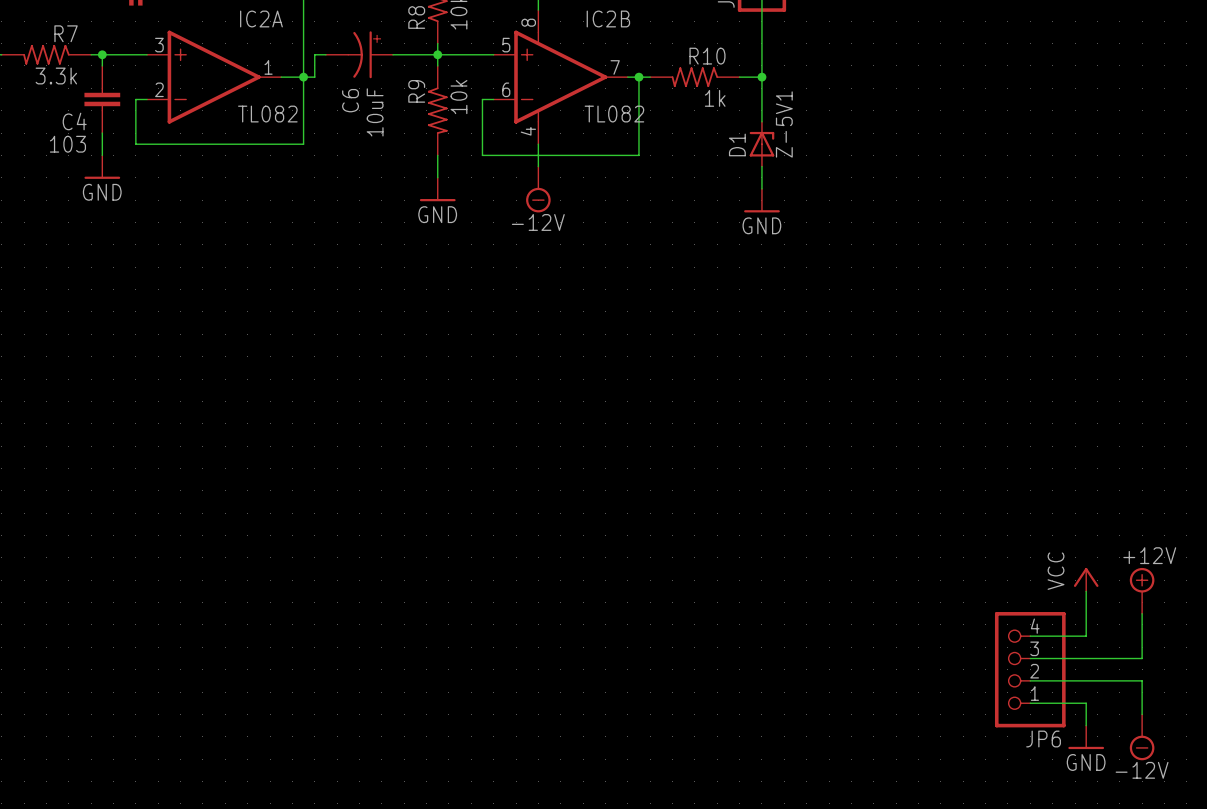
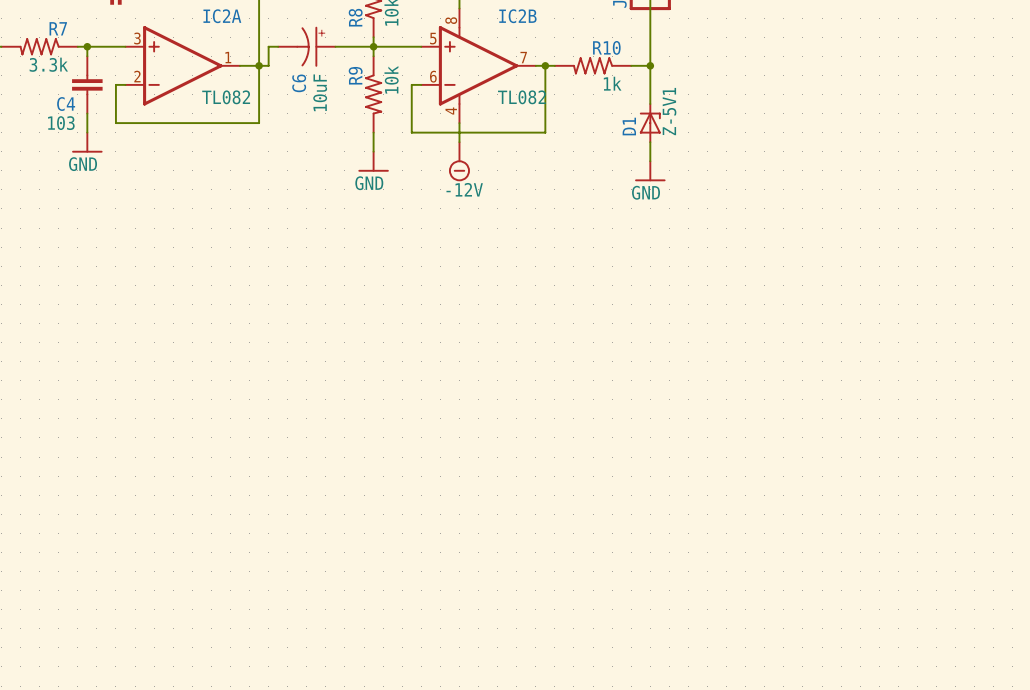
power symbol: VCC (1086, 579) -> none
power symbol: +12V (1142, 590) -> none
wire: (1086, 591) (1086, 636) (1030, 636) -> none
wire: (1142, 613) (1142, 658) (1030, 658) -> none
JP6: (1030, 669) -> none
wire: (1030, 680) (1142, 680) (1142, 714) -> none
wire: (1030, 703) (1086, 703) (1086, 725) -> none
power symbol: GND (1086, 737) -> none
power symbol: -12V (1142, 737) -> none

